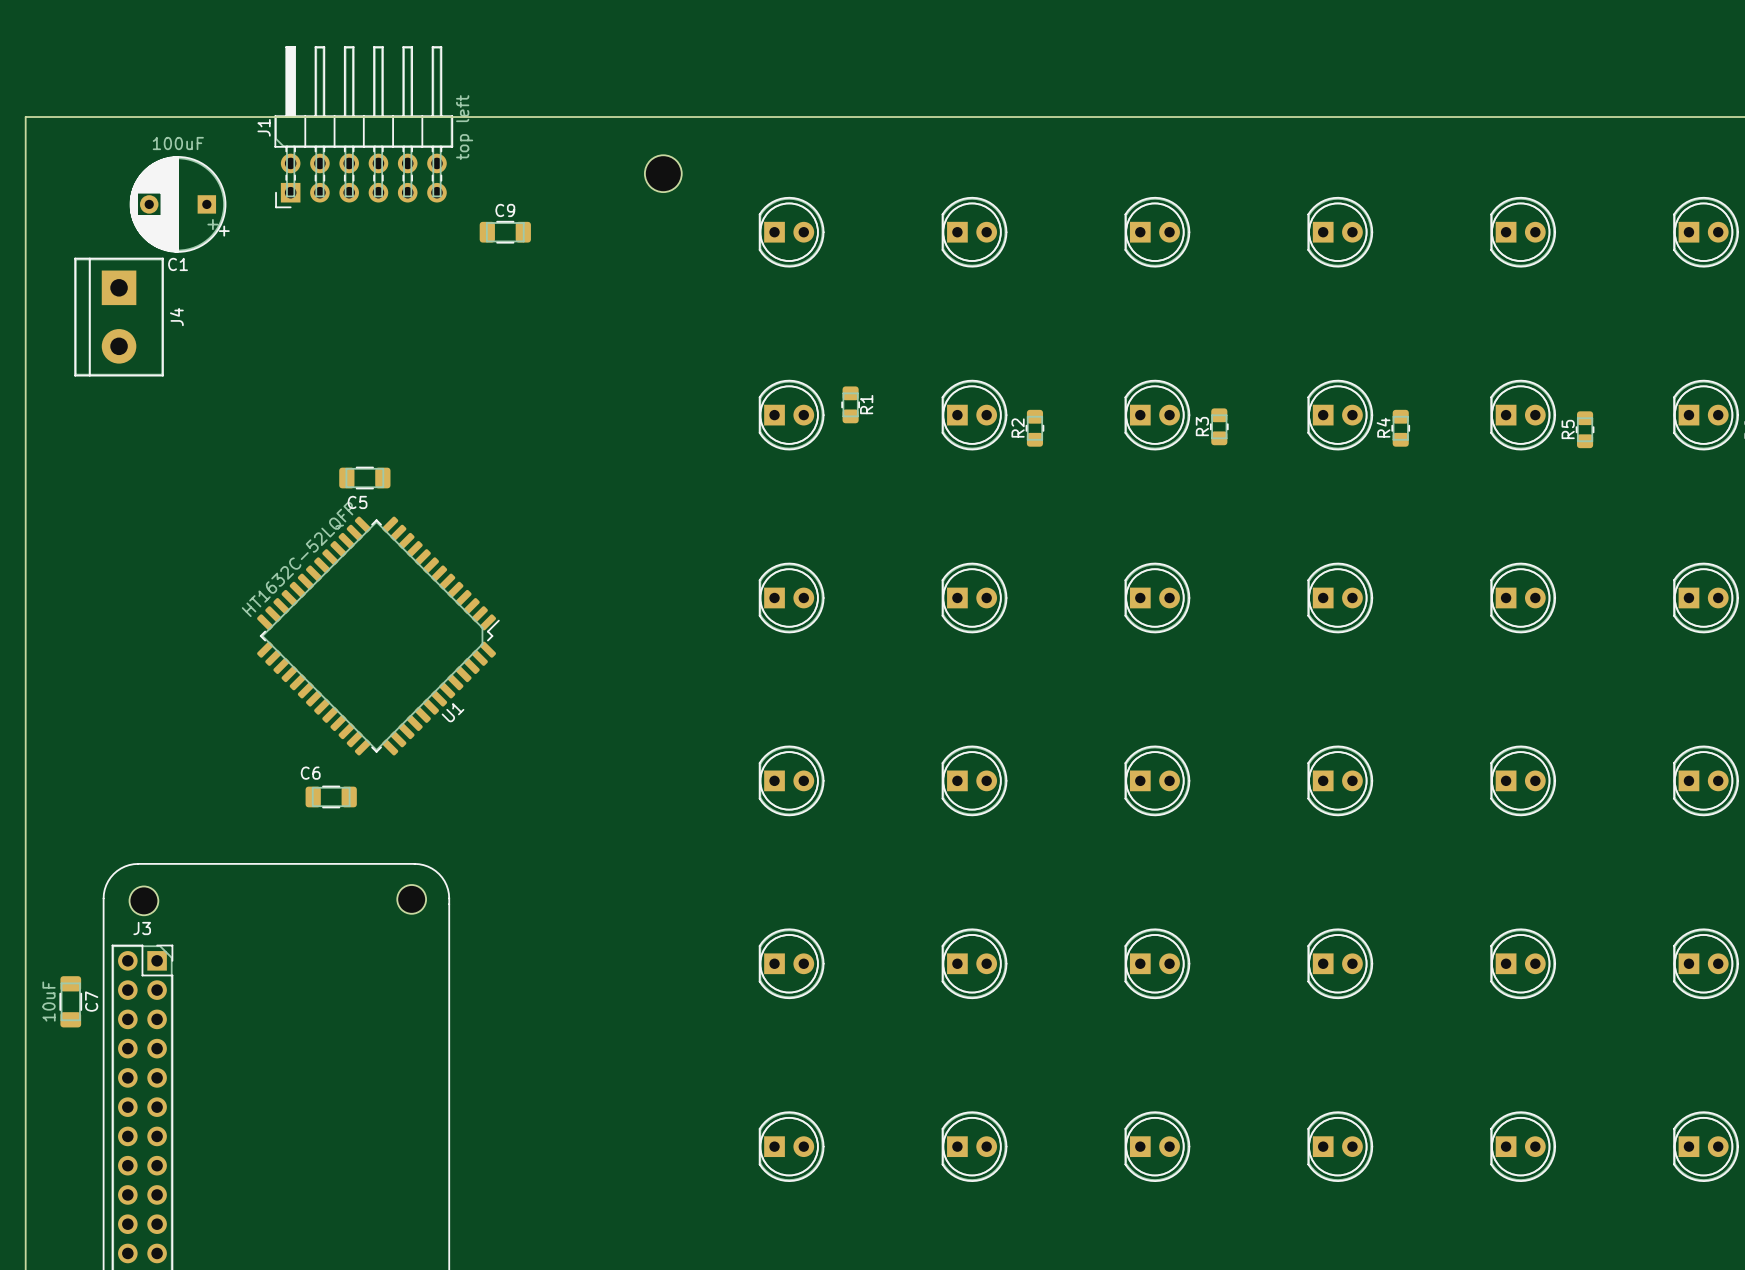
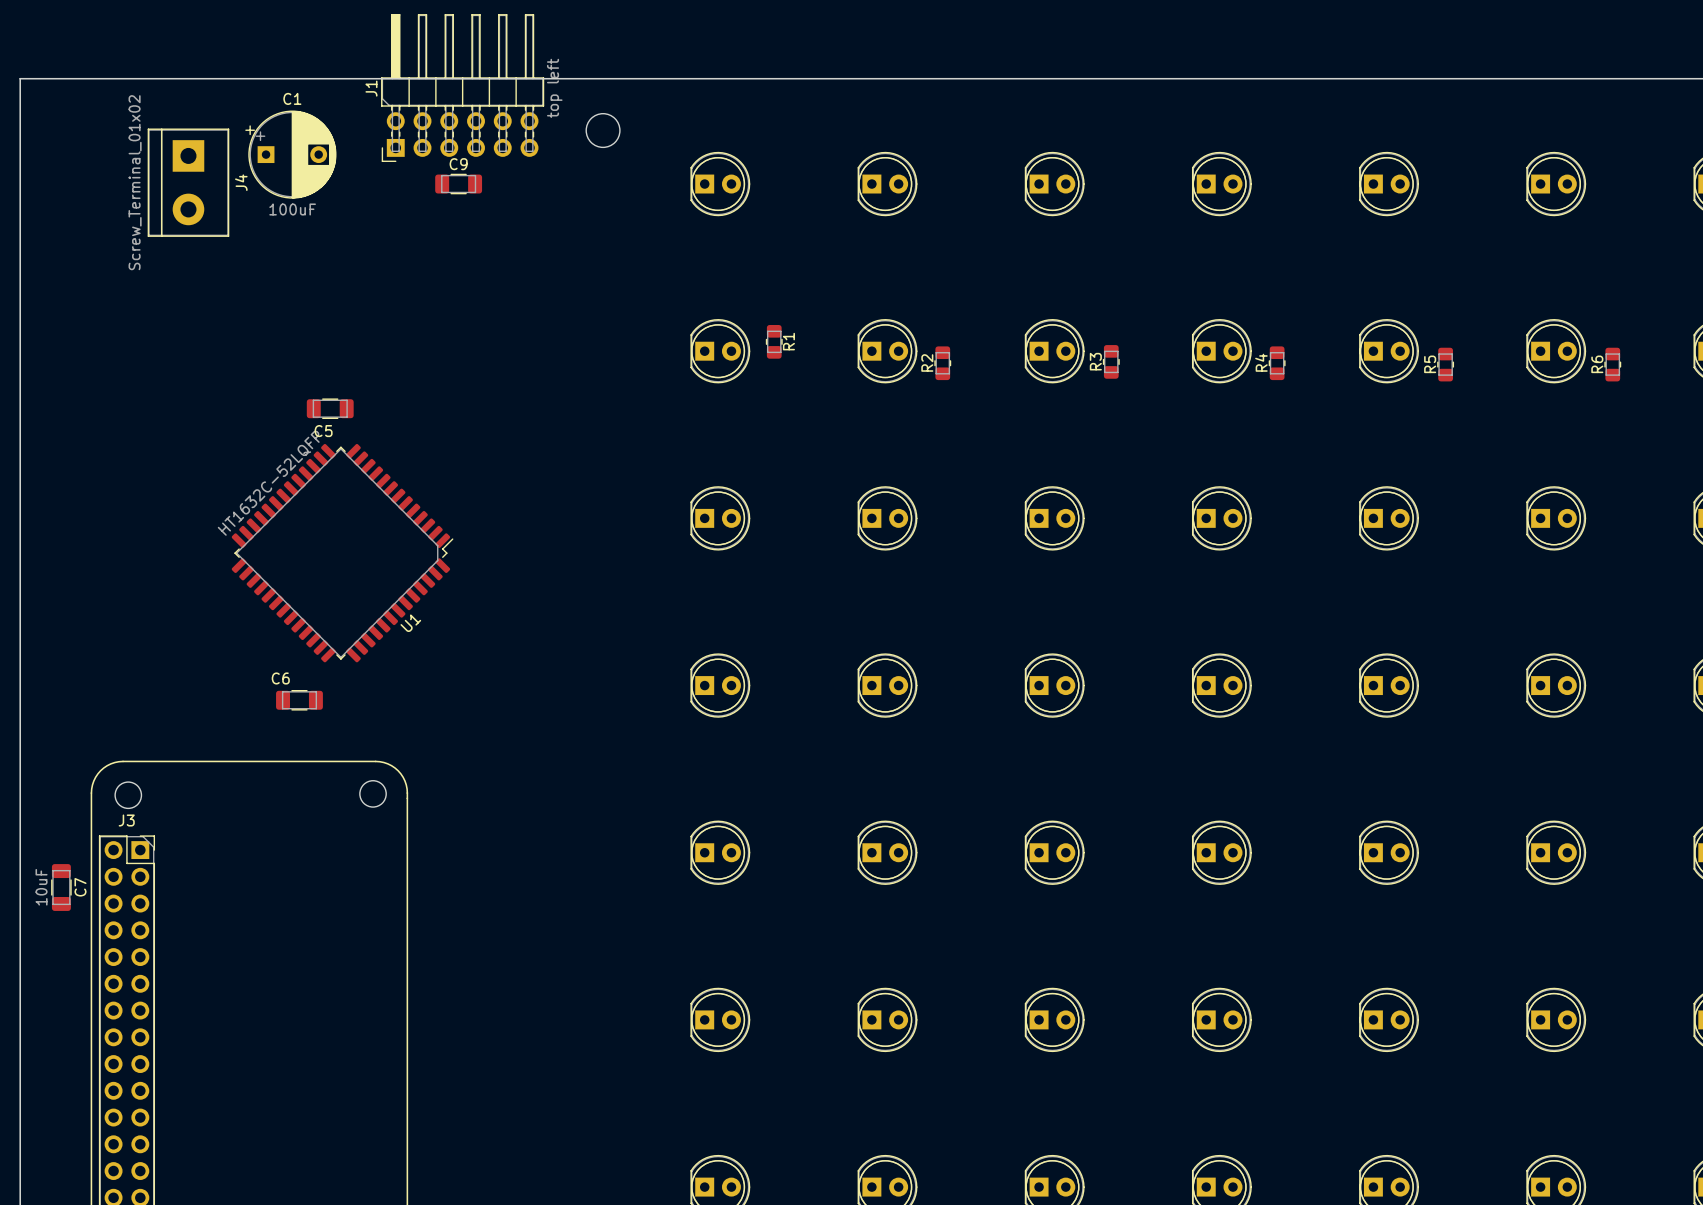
J1 position: (363, 127) -> (462, 88)
C1 rotation: 0° (179, 204) -> 180° (290, 154)
C1 position: (179, 204) -> (290, 154)
J4 value: none -> Screw_Terminal_01x02 (135, 182)
J4 position: (119, 317) -> (188, 182)

